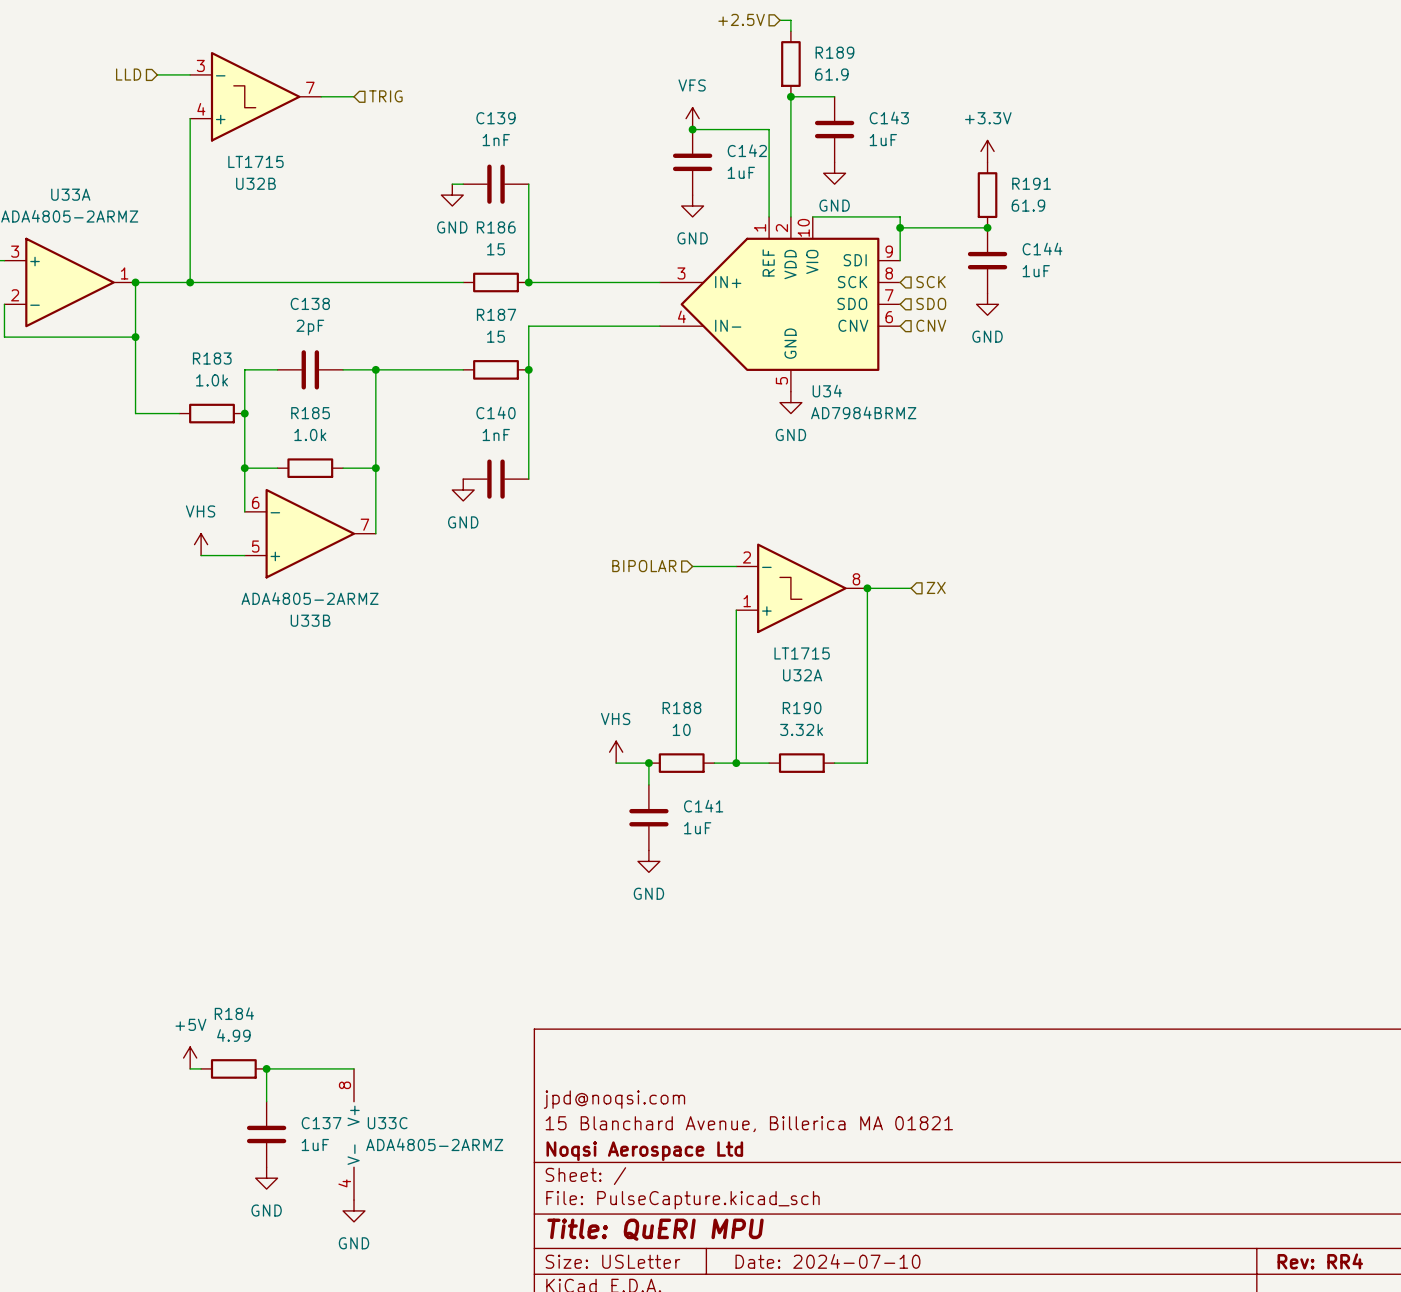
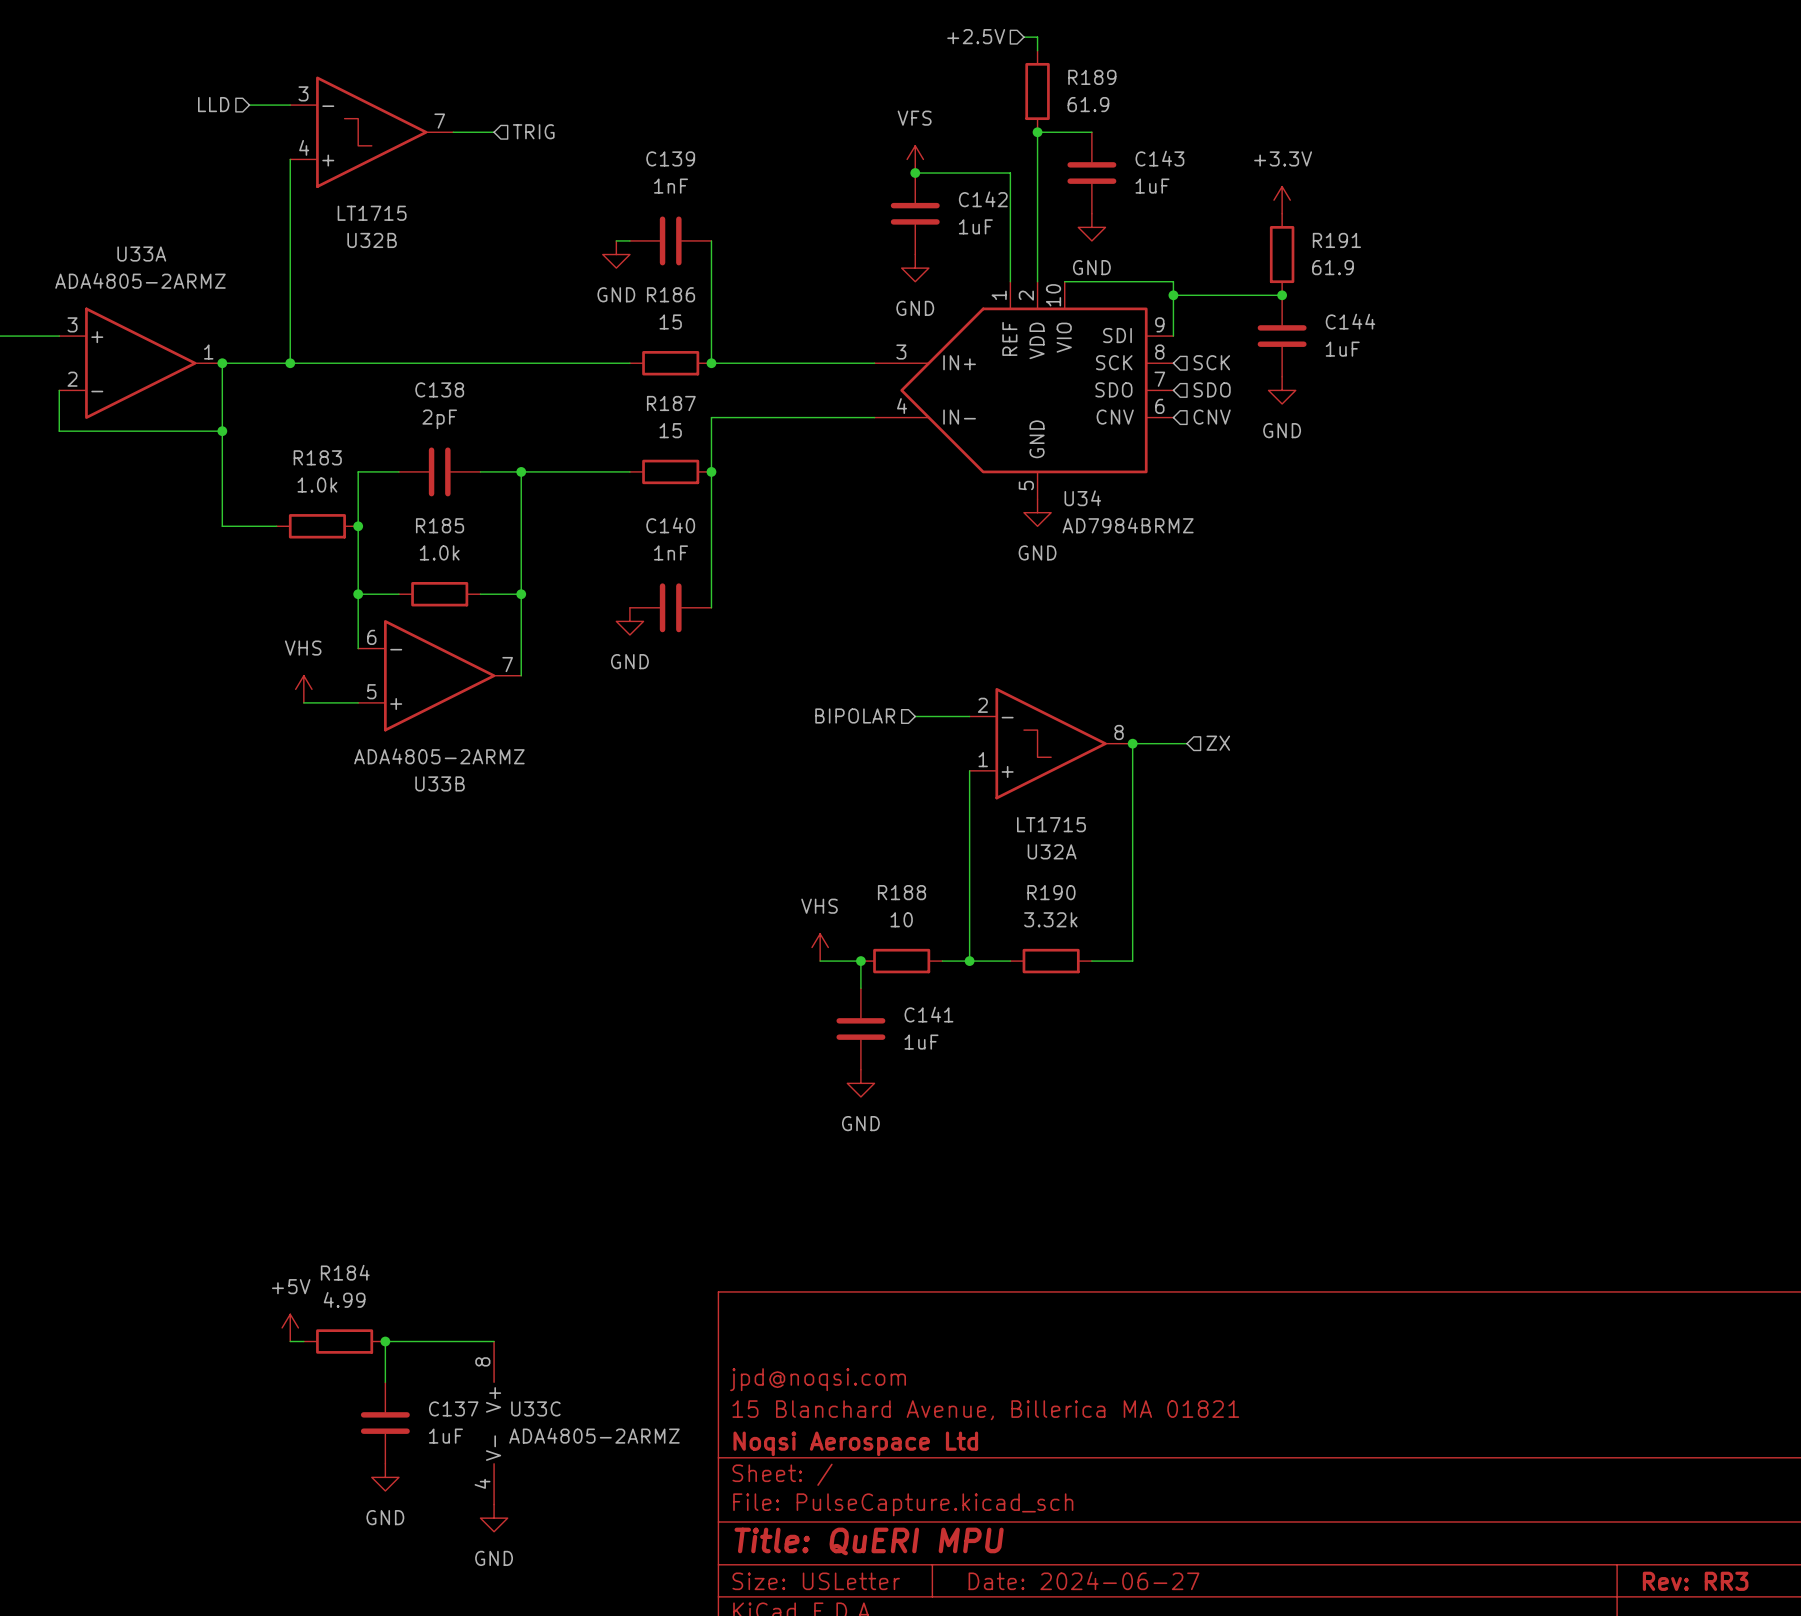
title block: Date: 2024-07-10 (827, 1261) -> Date: 2024-06-27 (1084, 1580)
title block: Rev: RR4 (1320, 1261) -> Rev: RR3 (1695, 1581)

